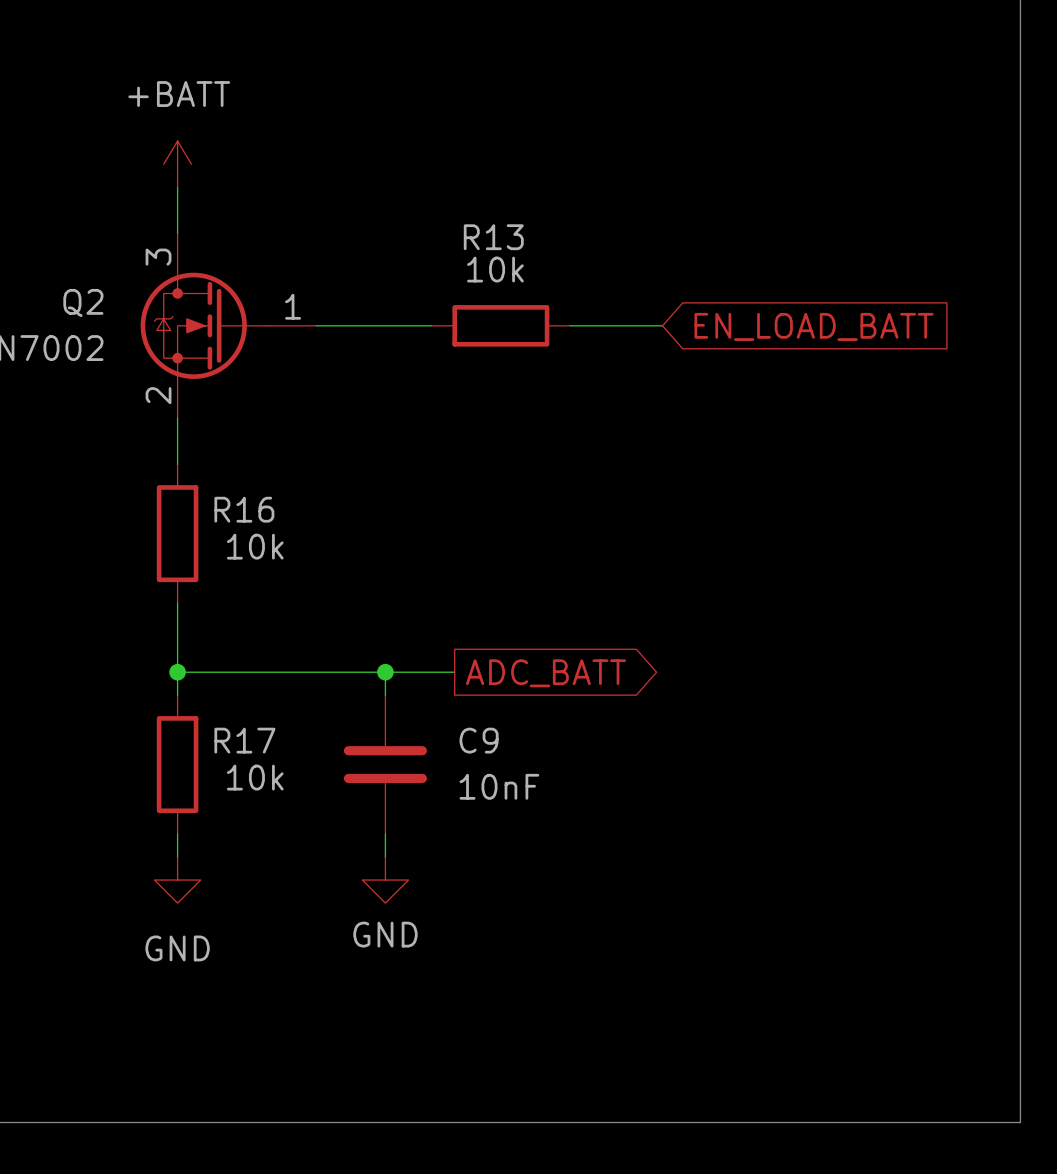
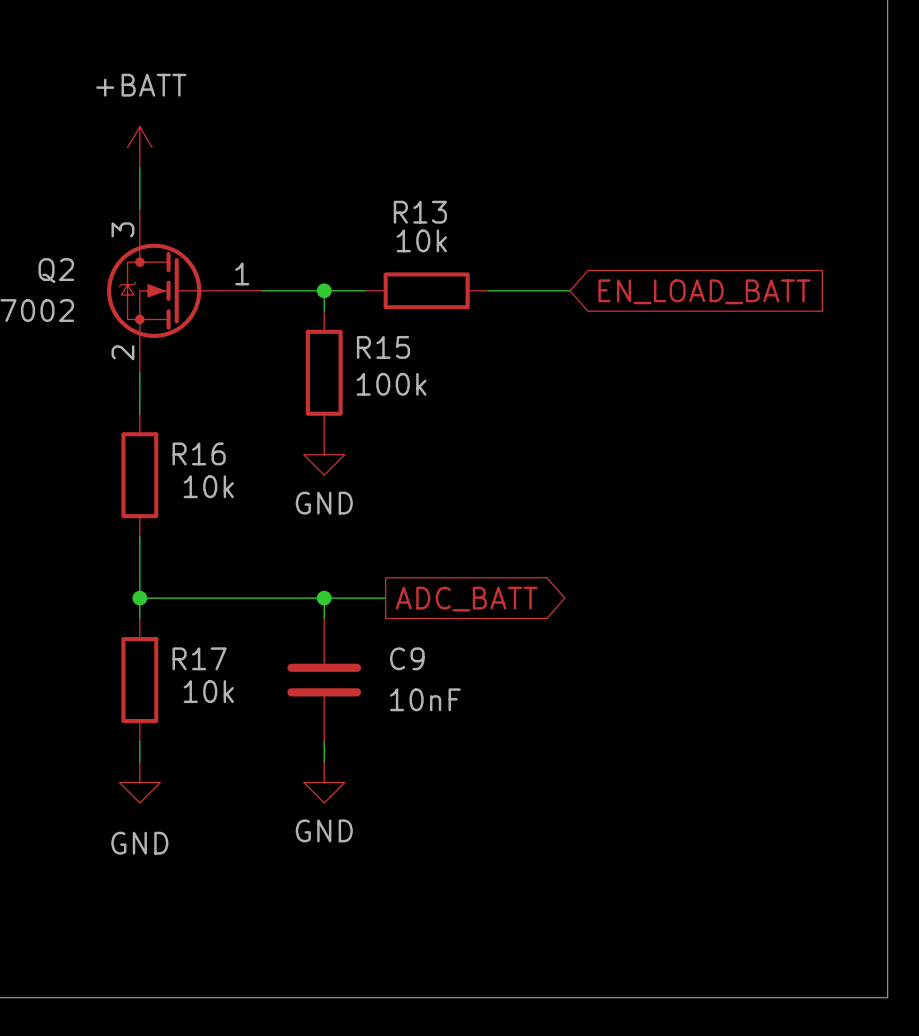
wire: none -> (324, 290) (324, 311)
junction: none -> (324, 290)
R15: none -> 100k (324, 372)
power symbol: none -> GND (324, 454)

